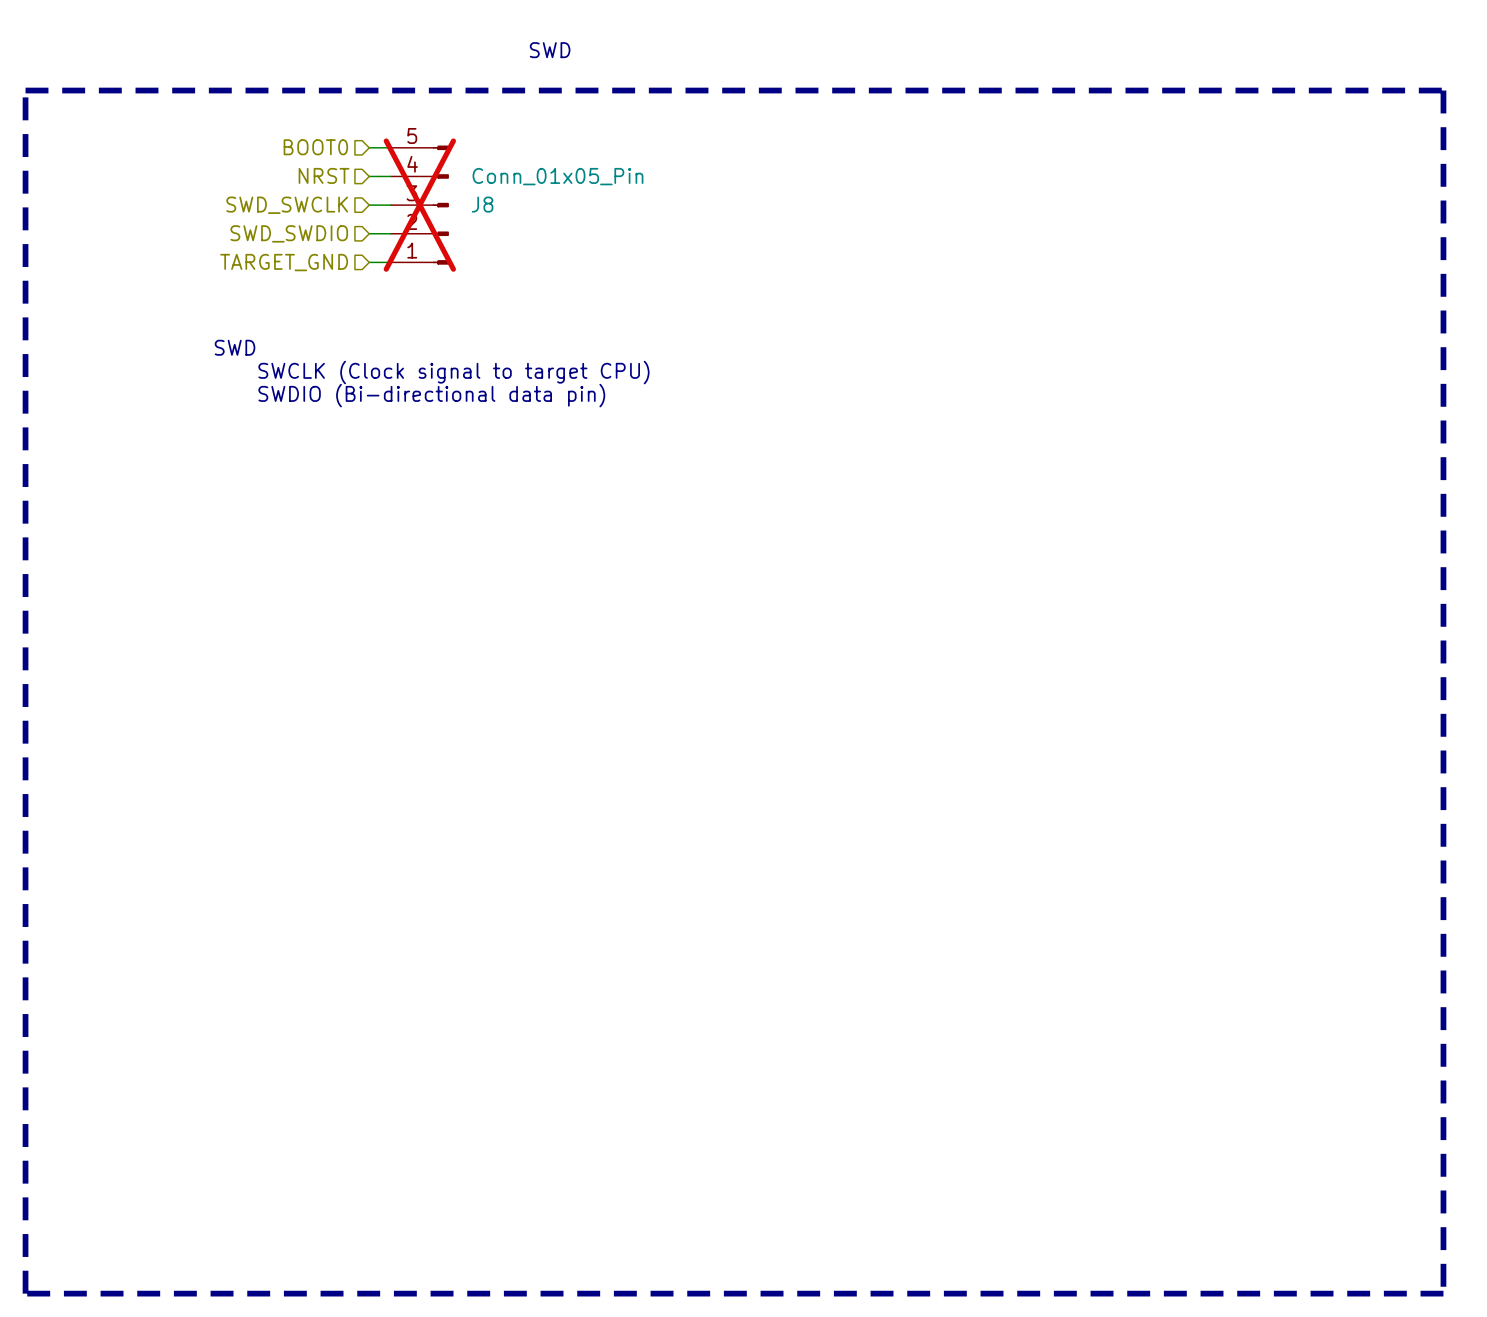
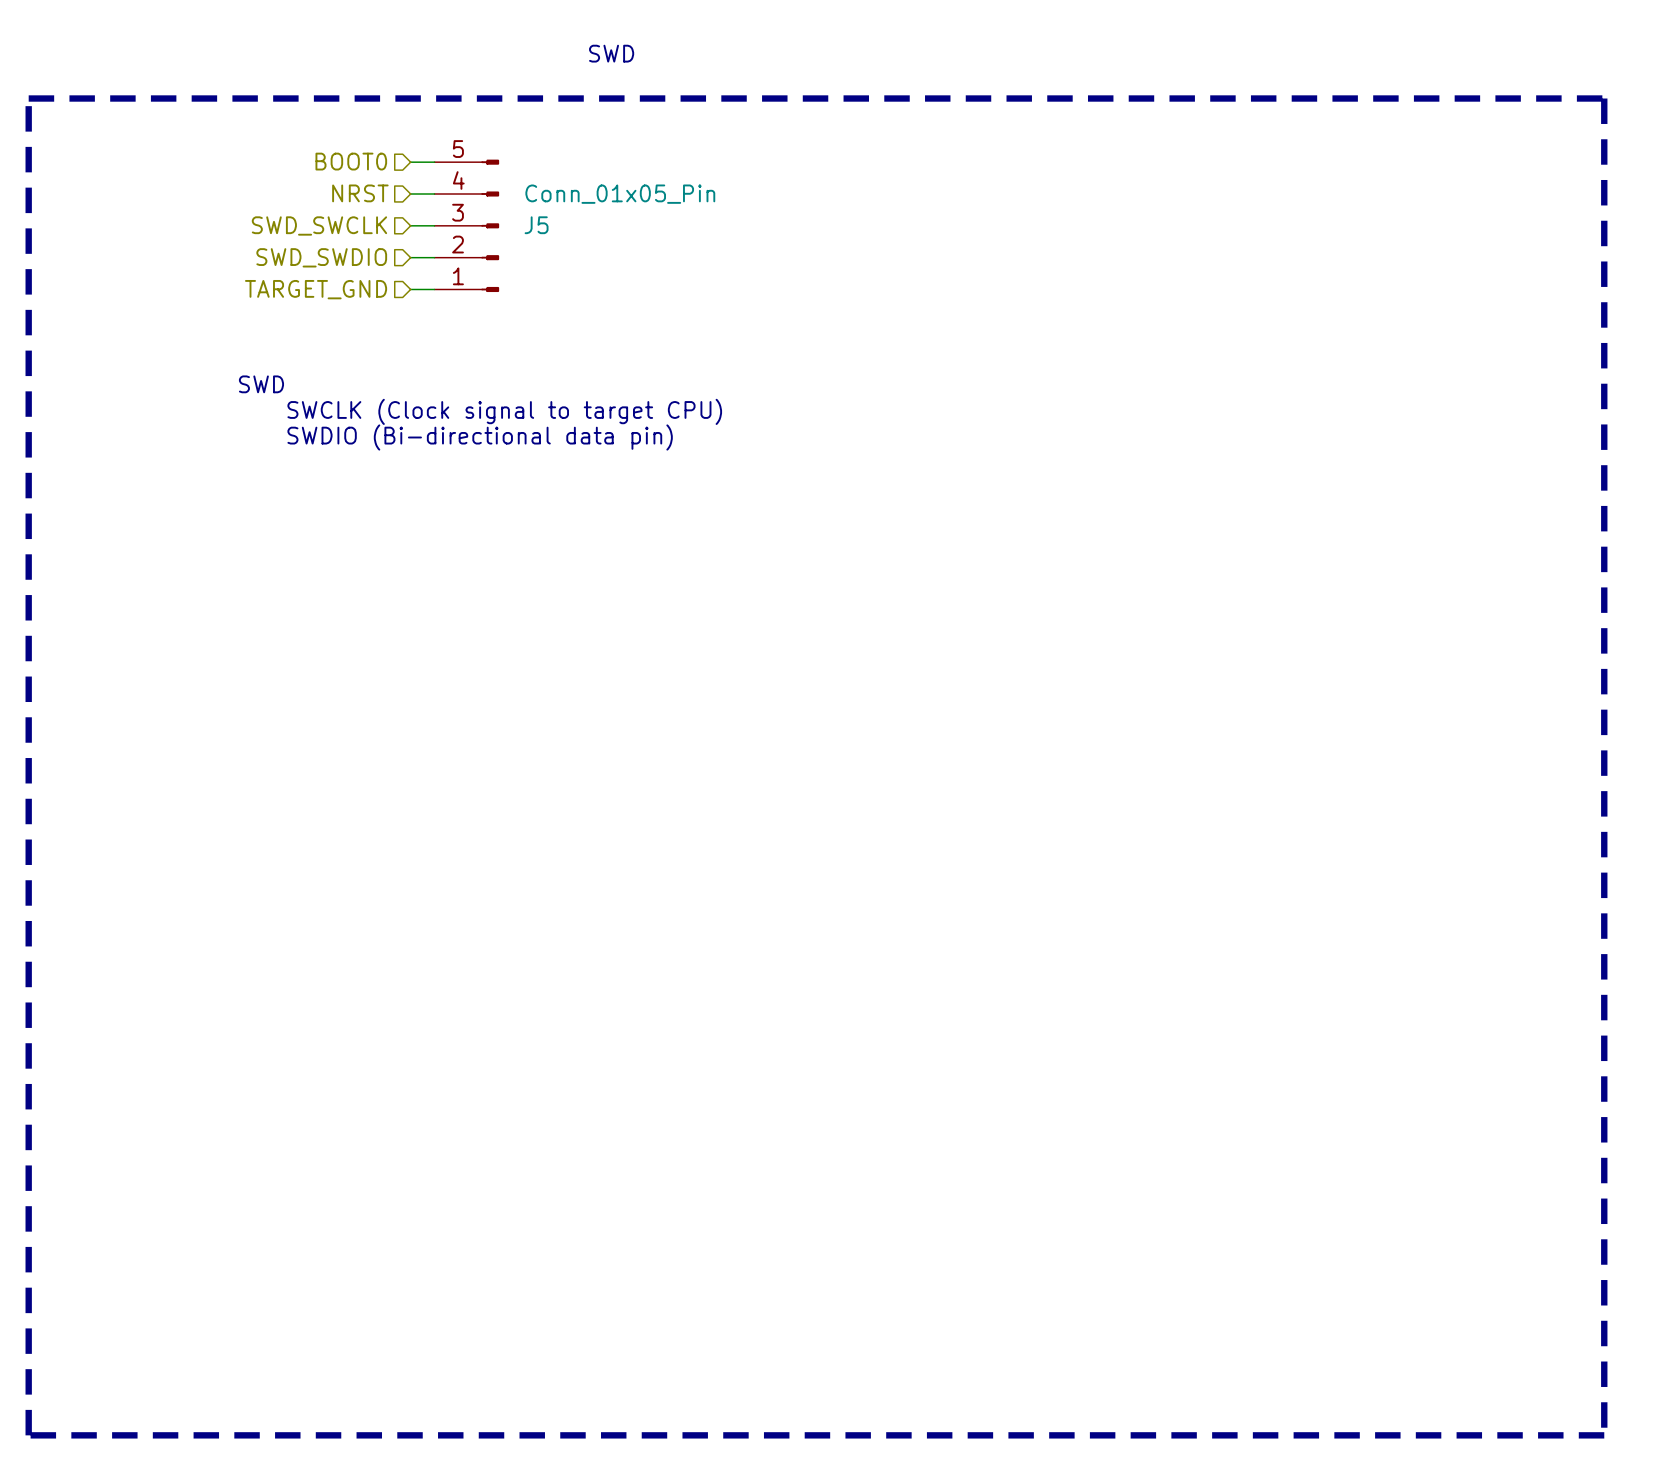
J8 name: J8 (482, 204) -> J5 (536, 225)
J8 do-not-place cross: (419, 205) -> none

